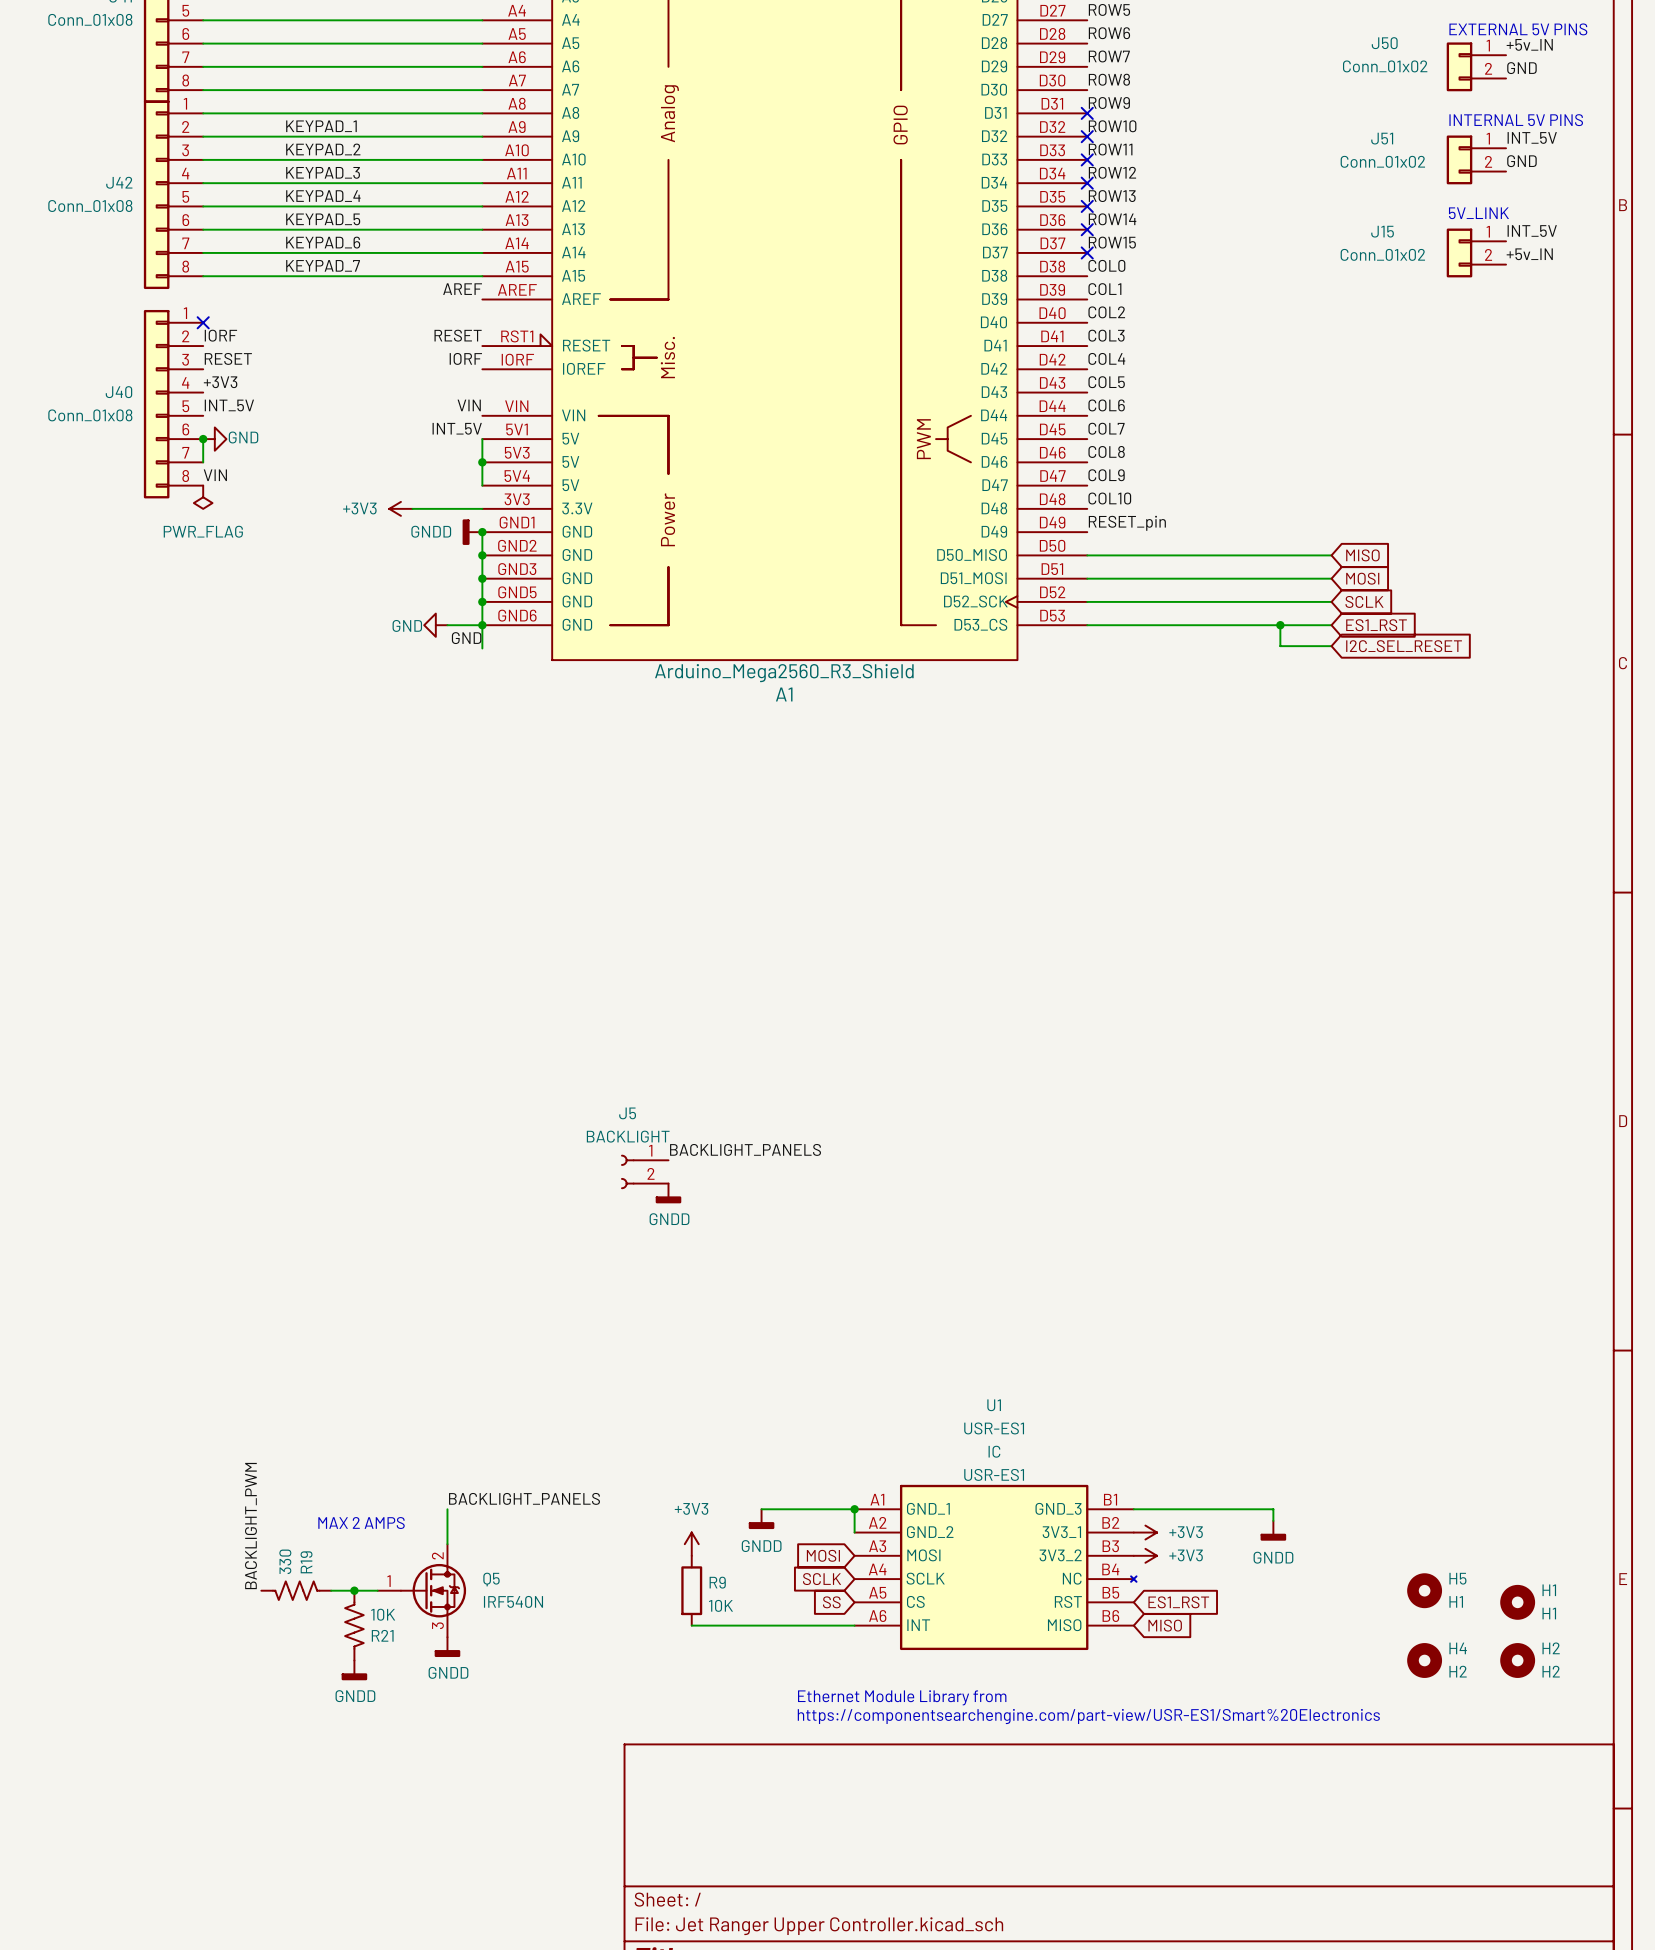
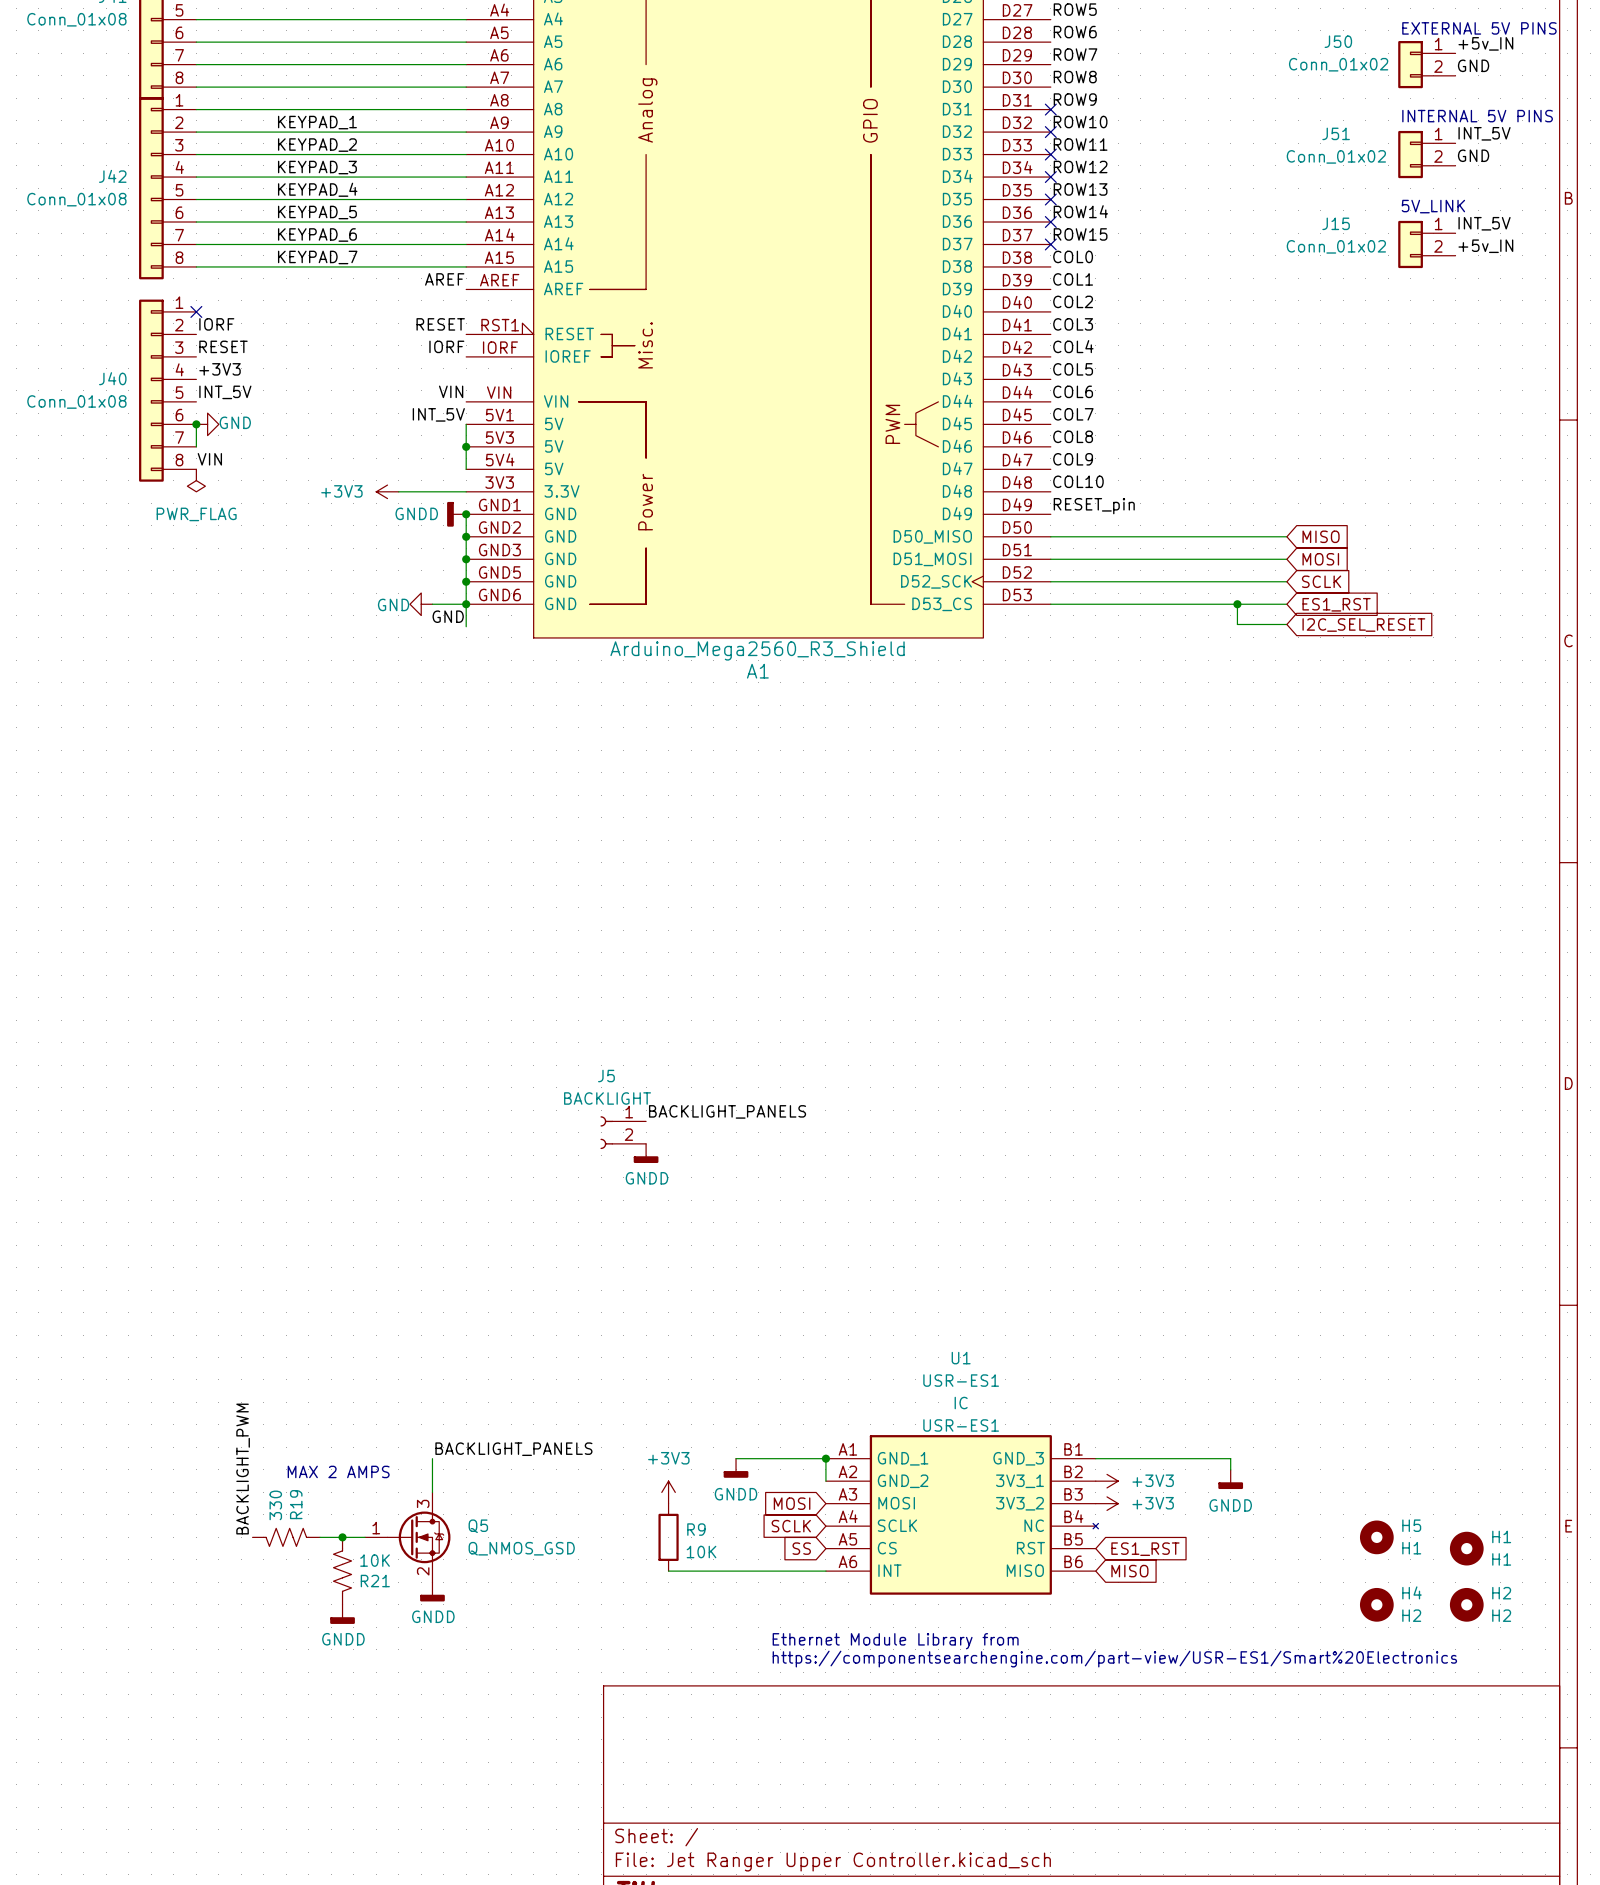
Q5 pin number: 2 (437, 1555) -> 3 (423, 1503)
Q5 value: IRF540N (513, 1601) -> Q_NMOS_GSD (521, 1548)
Q5 pin number: 3 (437, 1625) -> 2 (423, 1571)

